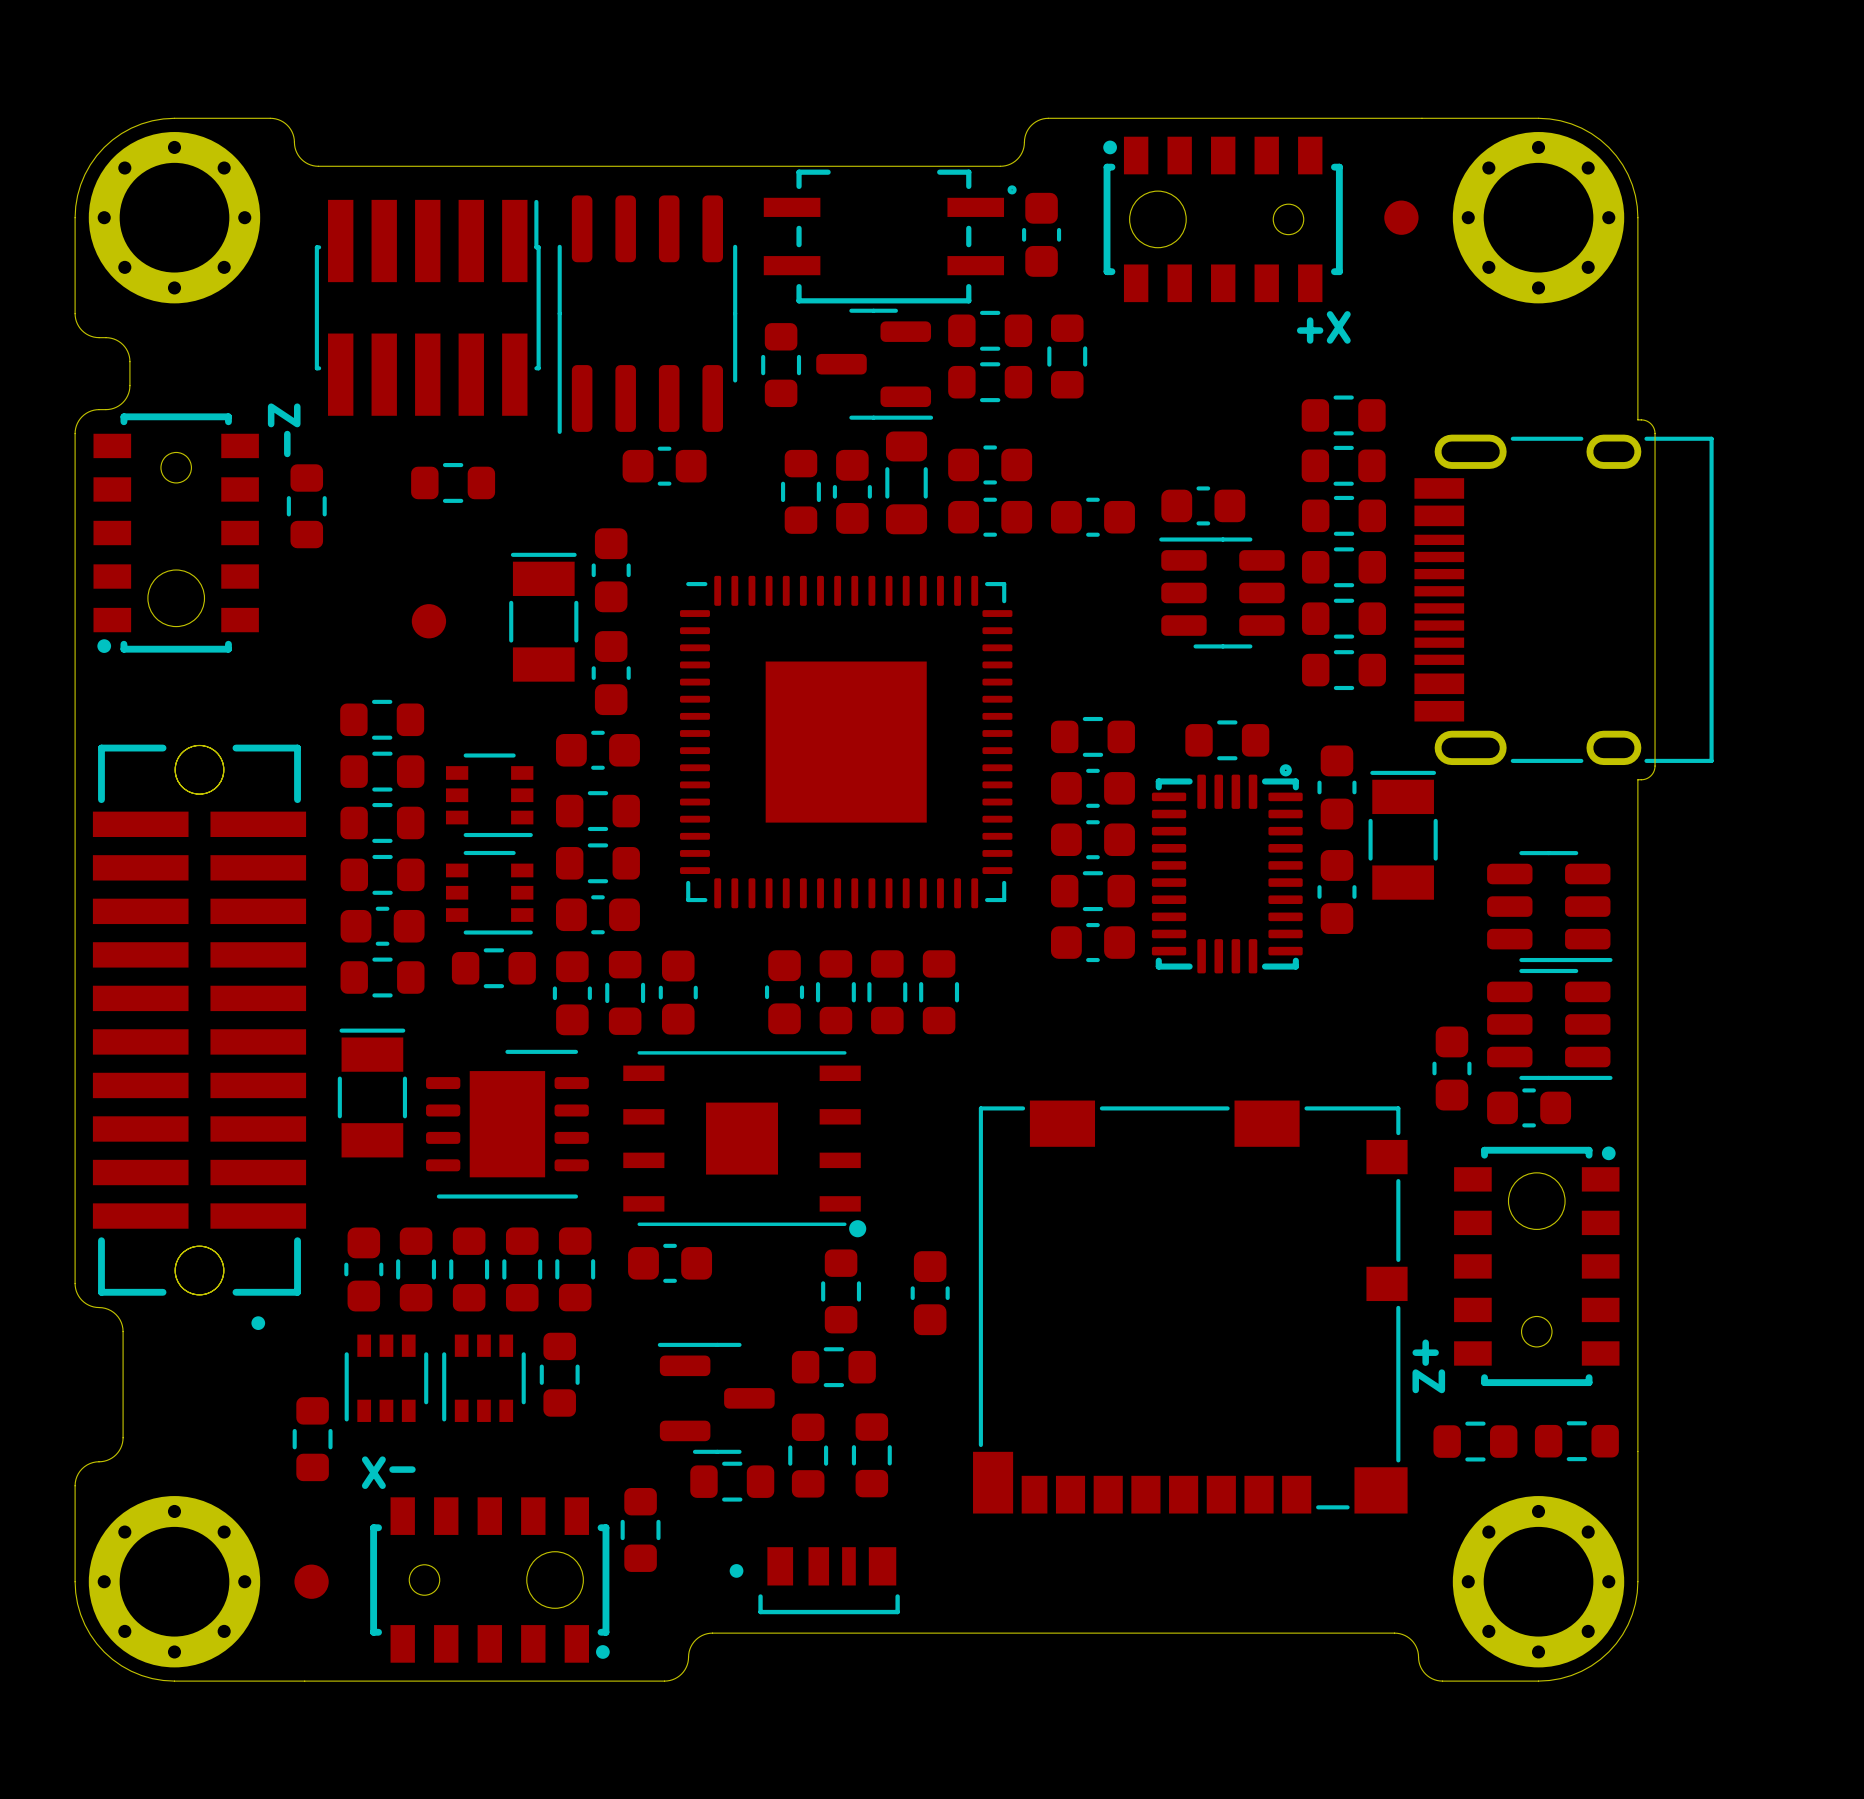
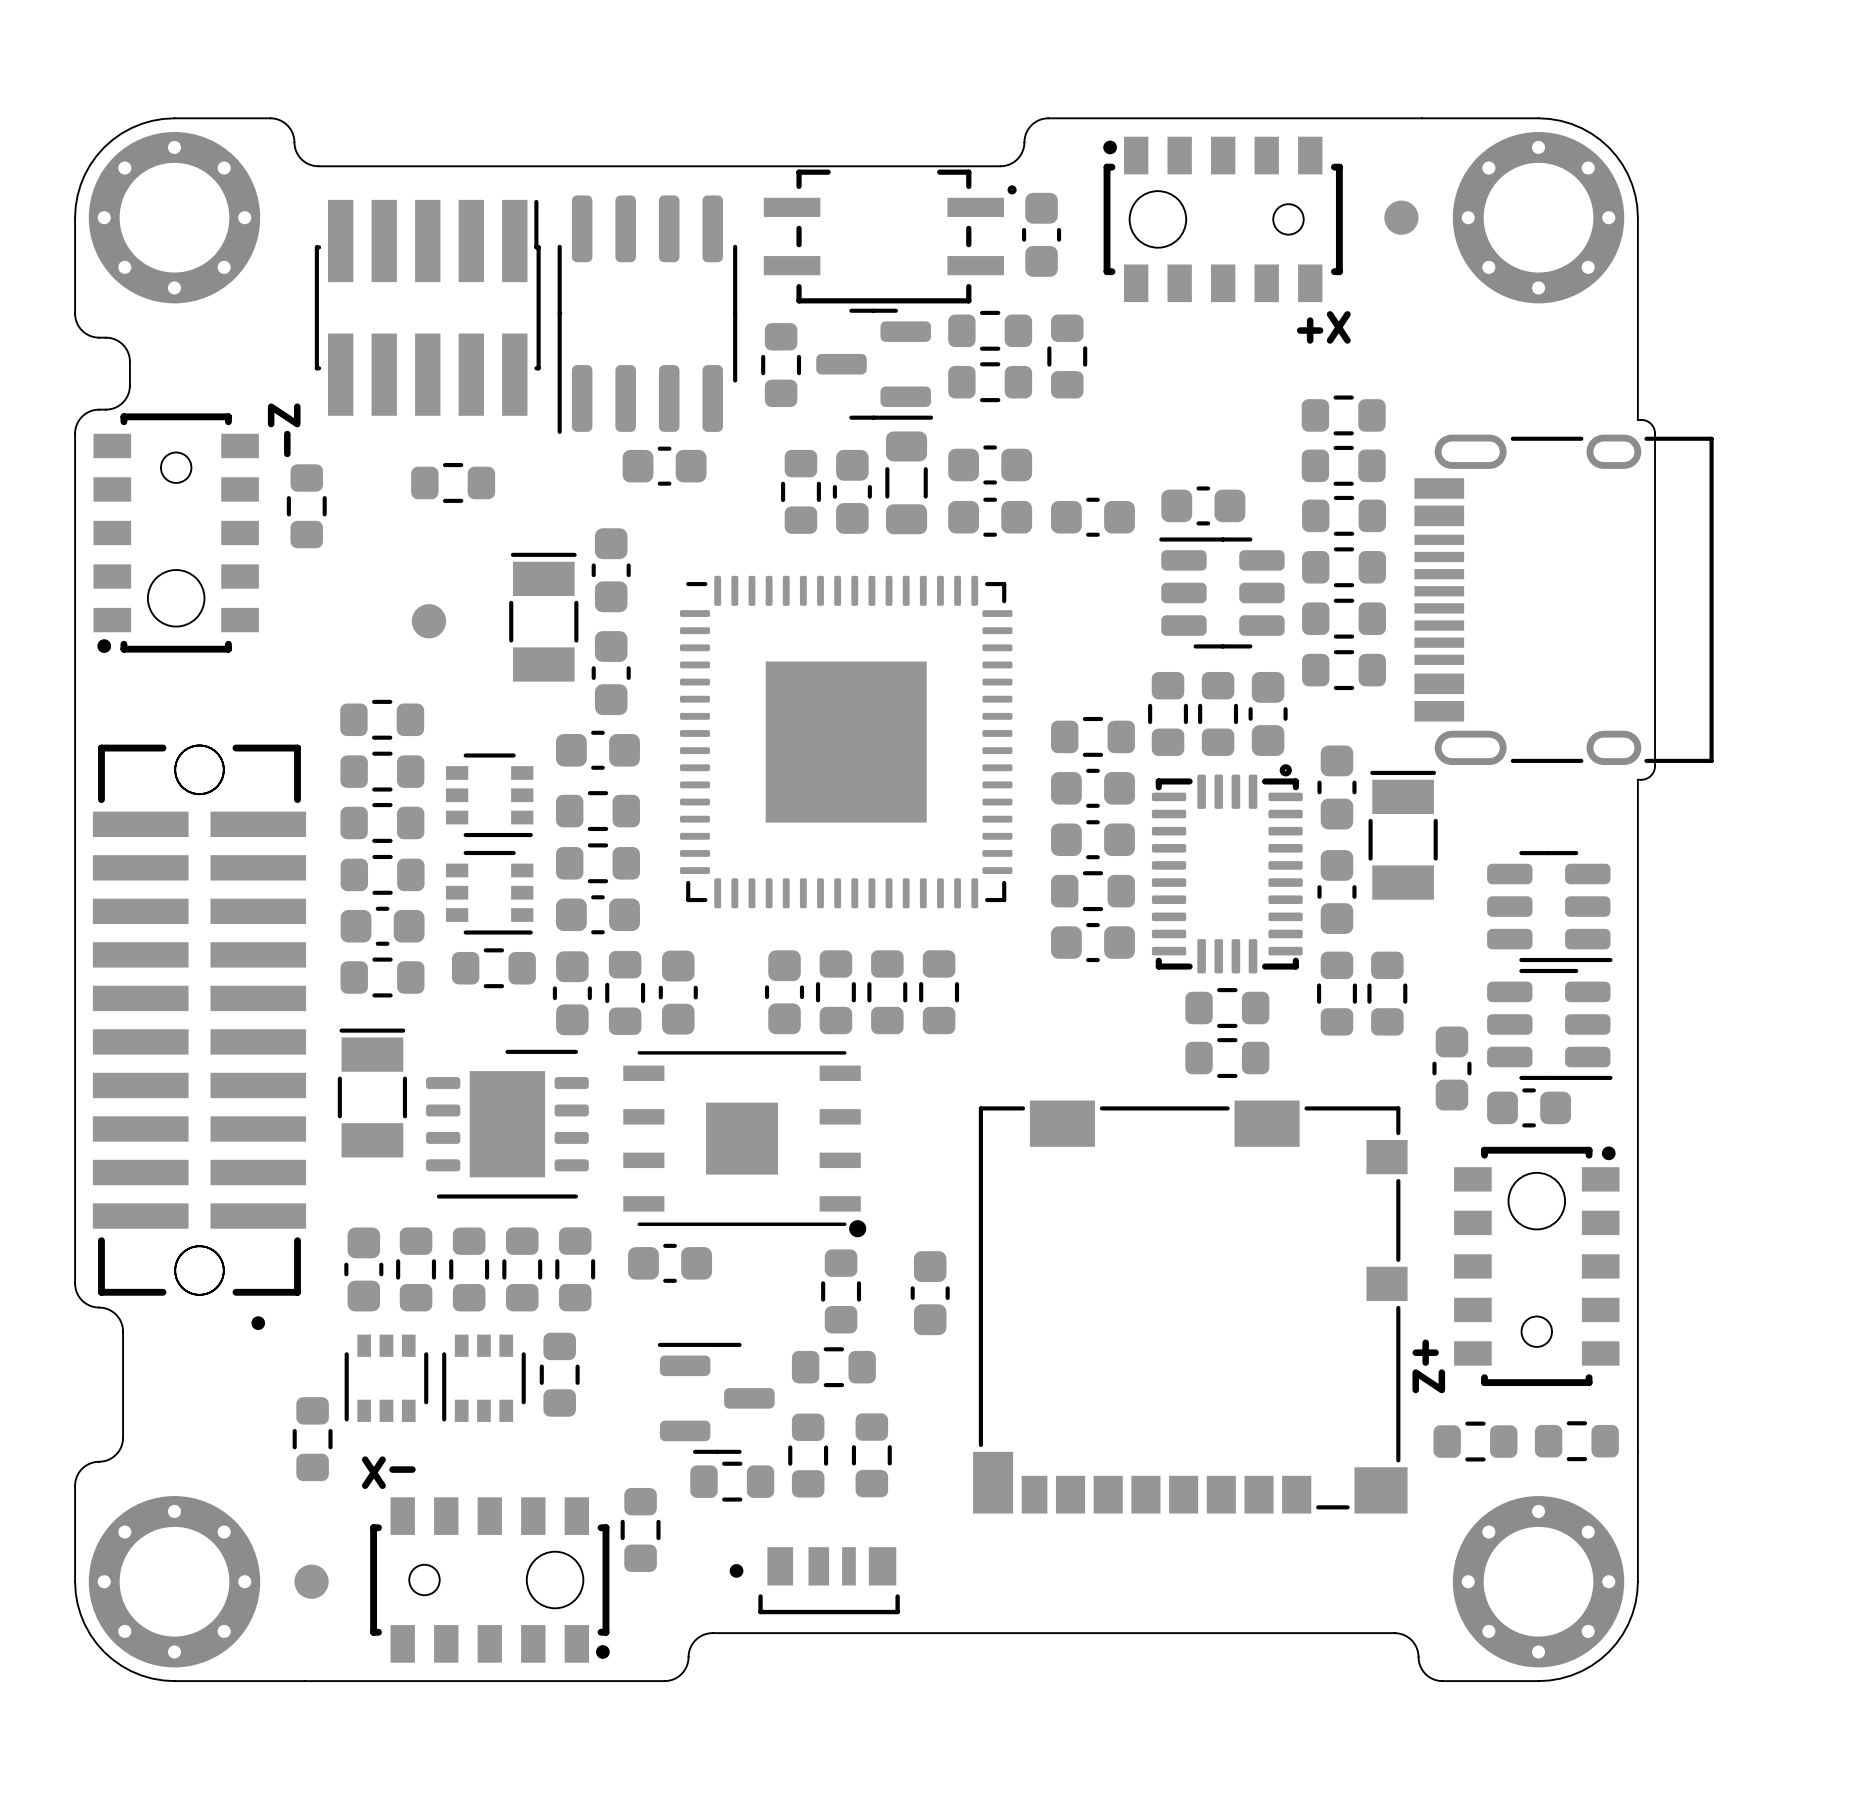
part: none -> (1168, 713)
part: none -> (1268, 713)
part rotation: 0° (1227, 740) -> 90° clockwise (1218, 713)
part: none -> (1336, 993)
part: none -> (1387, 993)
part: none -> (1227, 1008)
part: none -> (1227, 1058)

